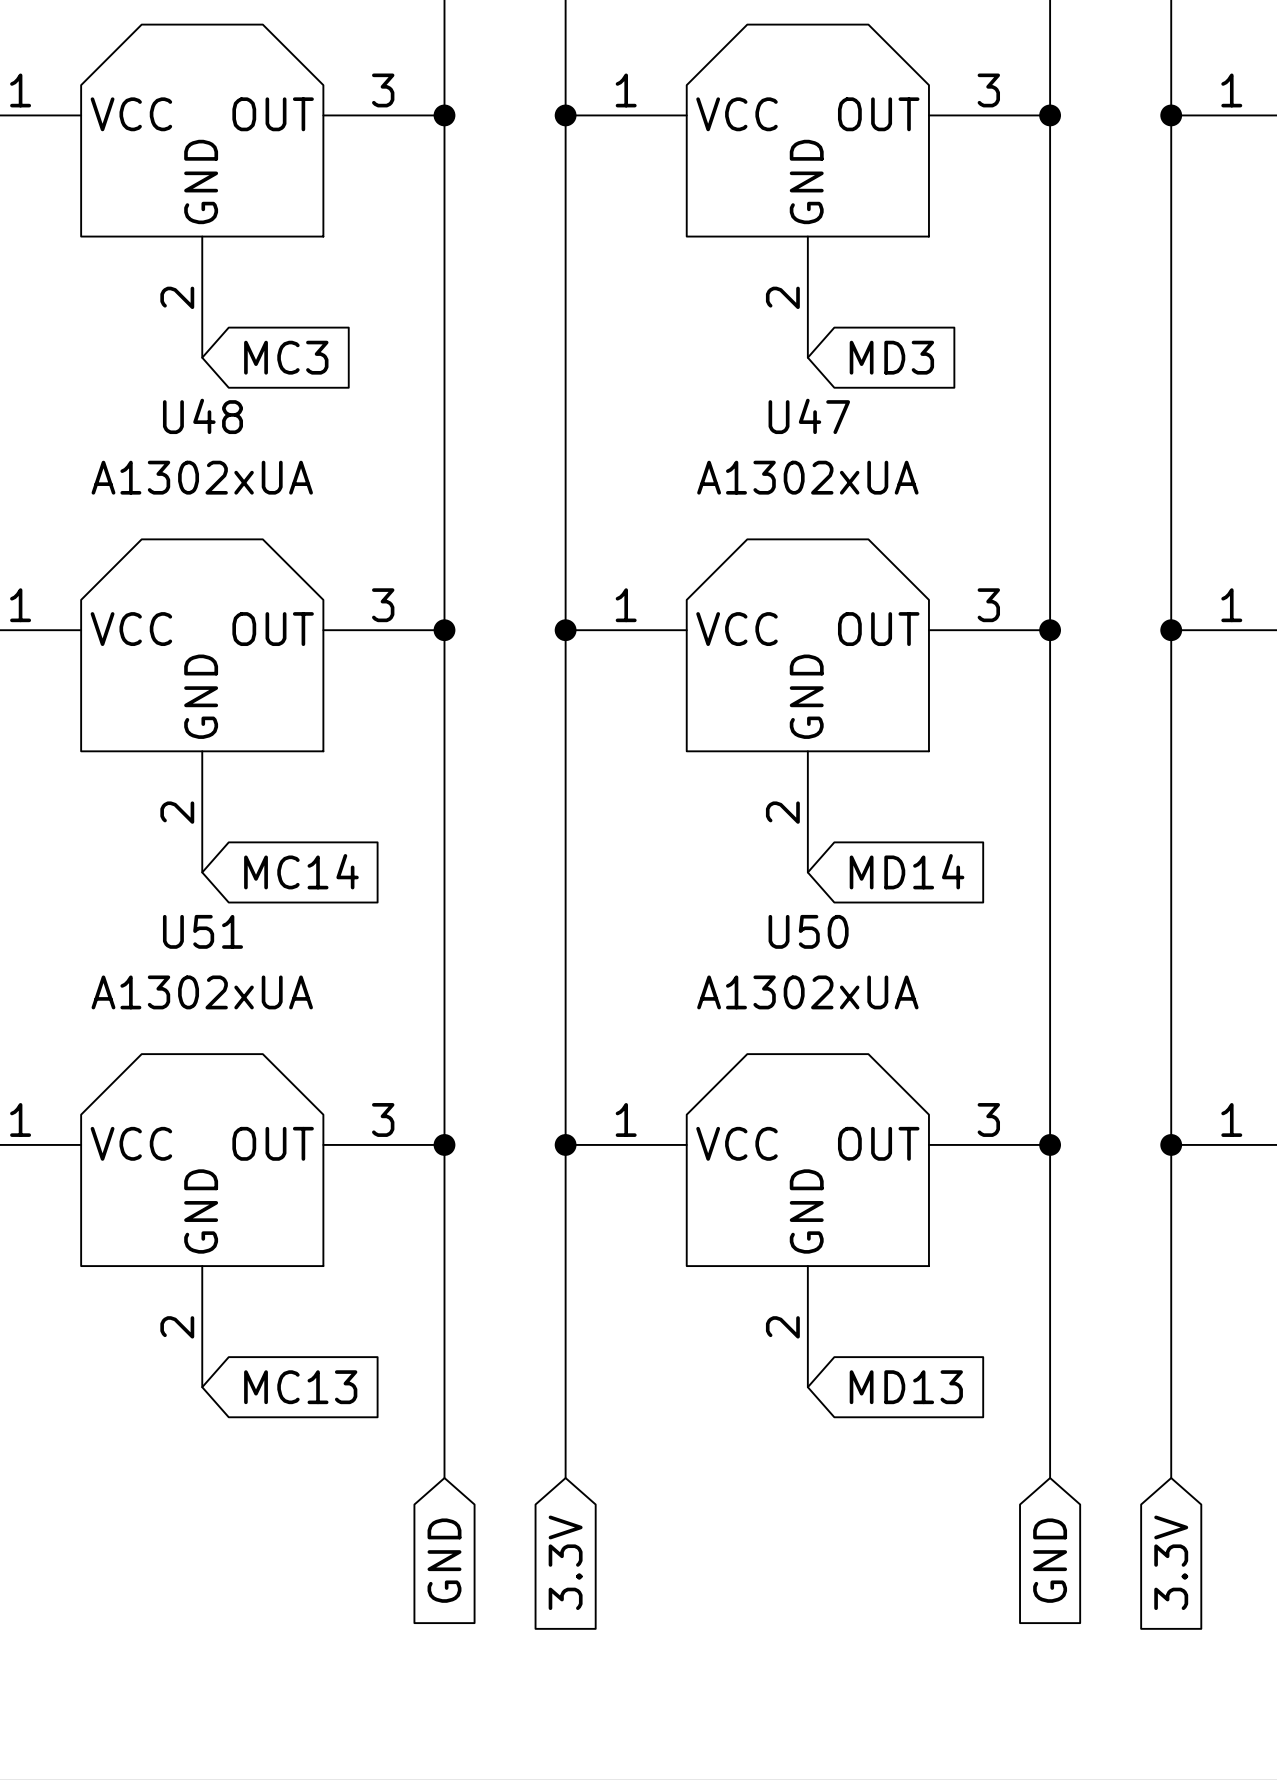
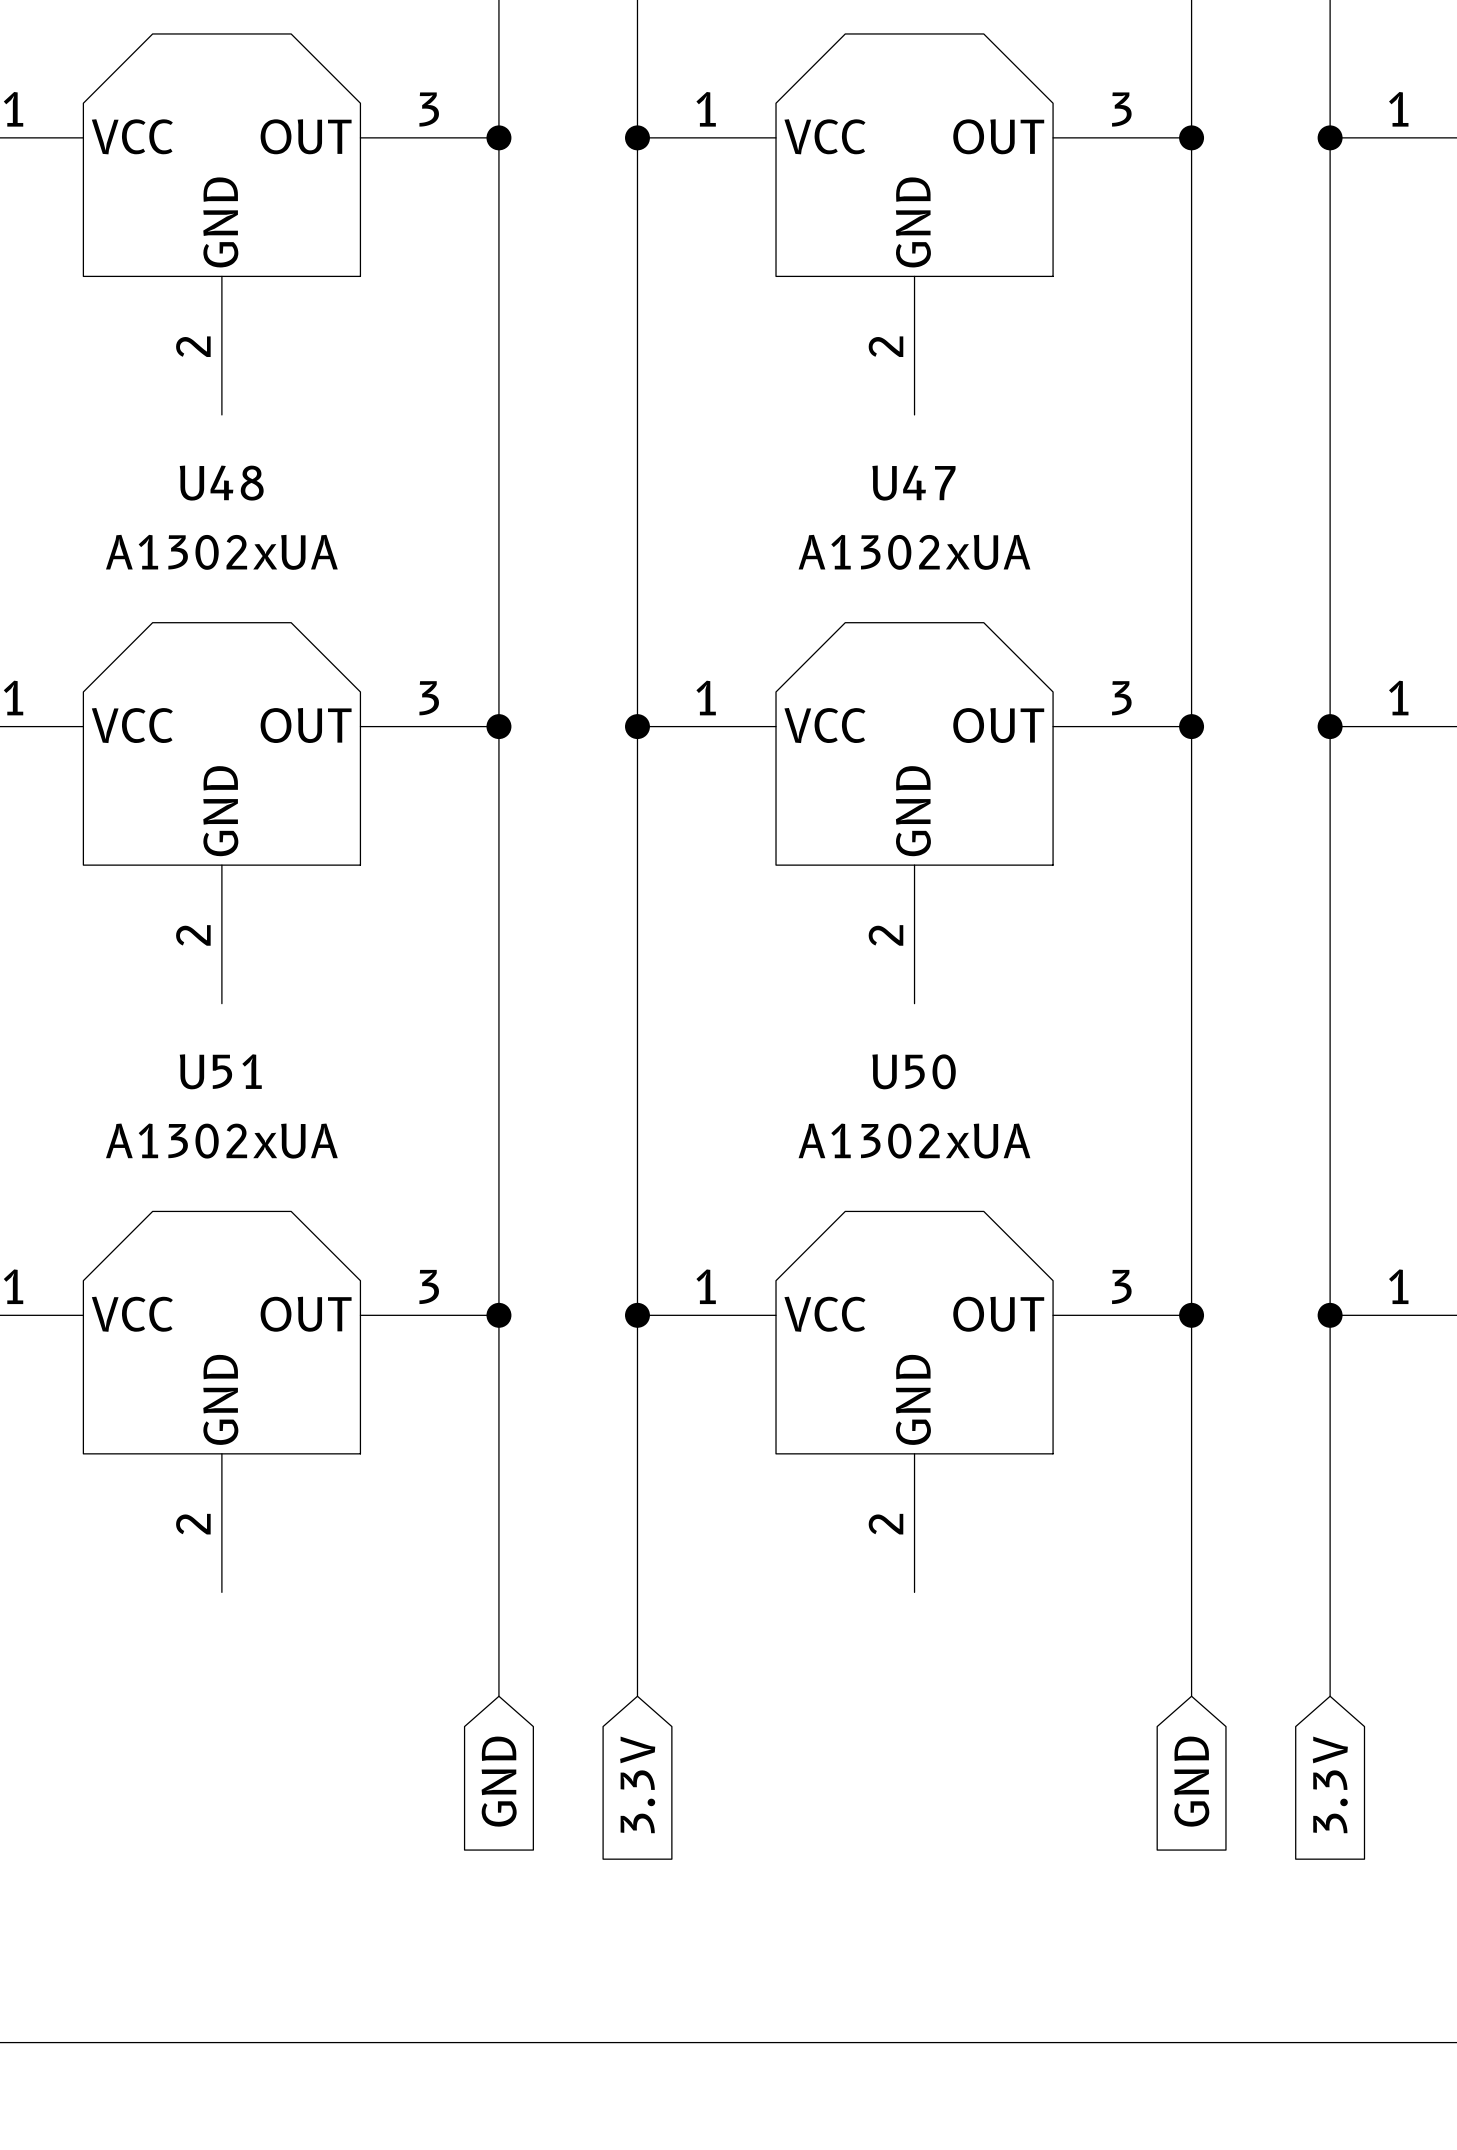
global label: MC3 (286, 357) -> none
global label: MD3 (891, 357) -> none
global label: MC14 (301, 871) -> none
global label: MD14 (907, 871) -> none
global label: MC13 (300, 1387) -> none
global label: MD13 (906, 1387) -> none

